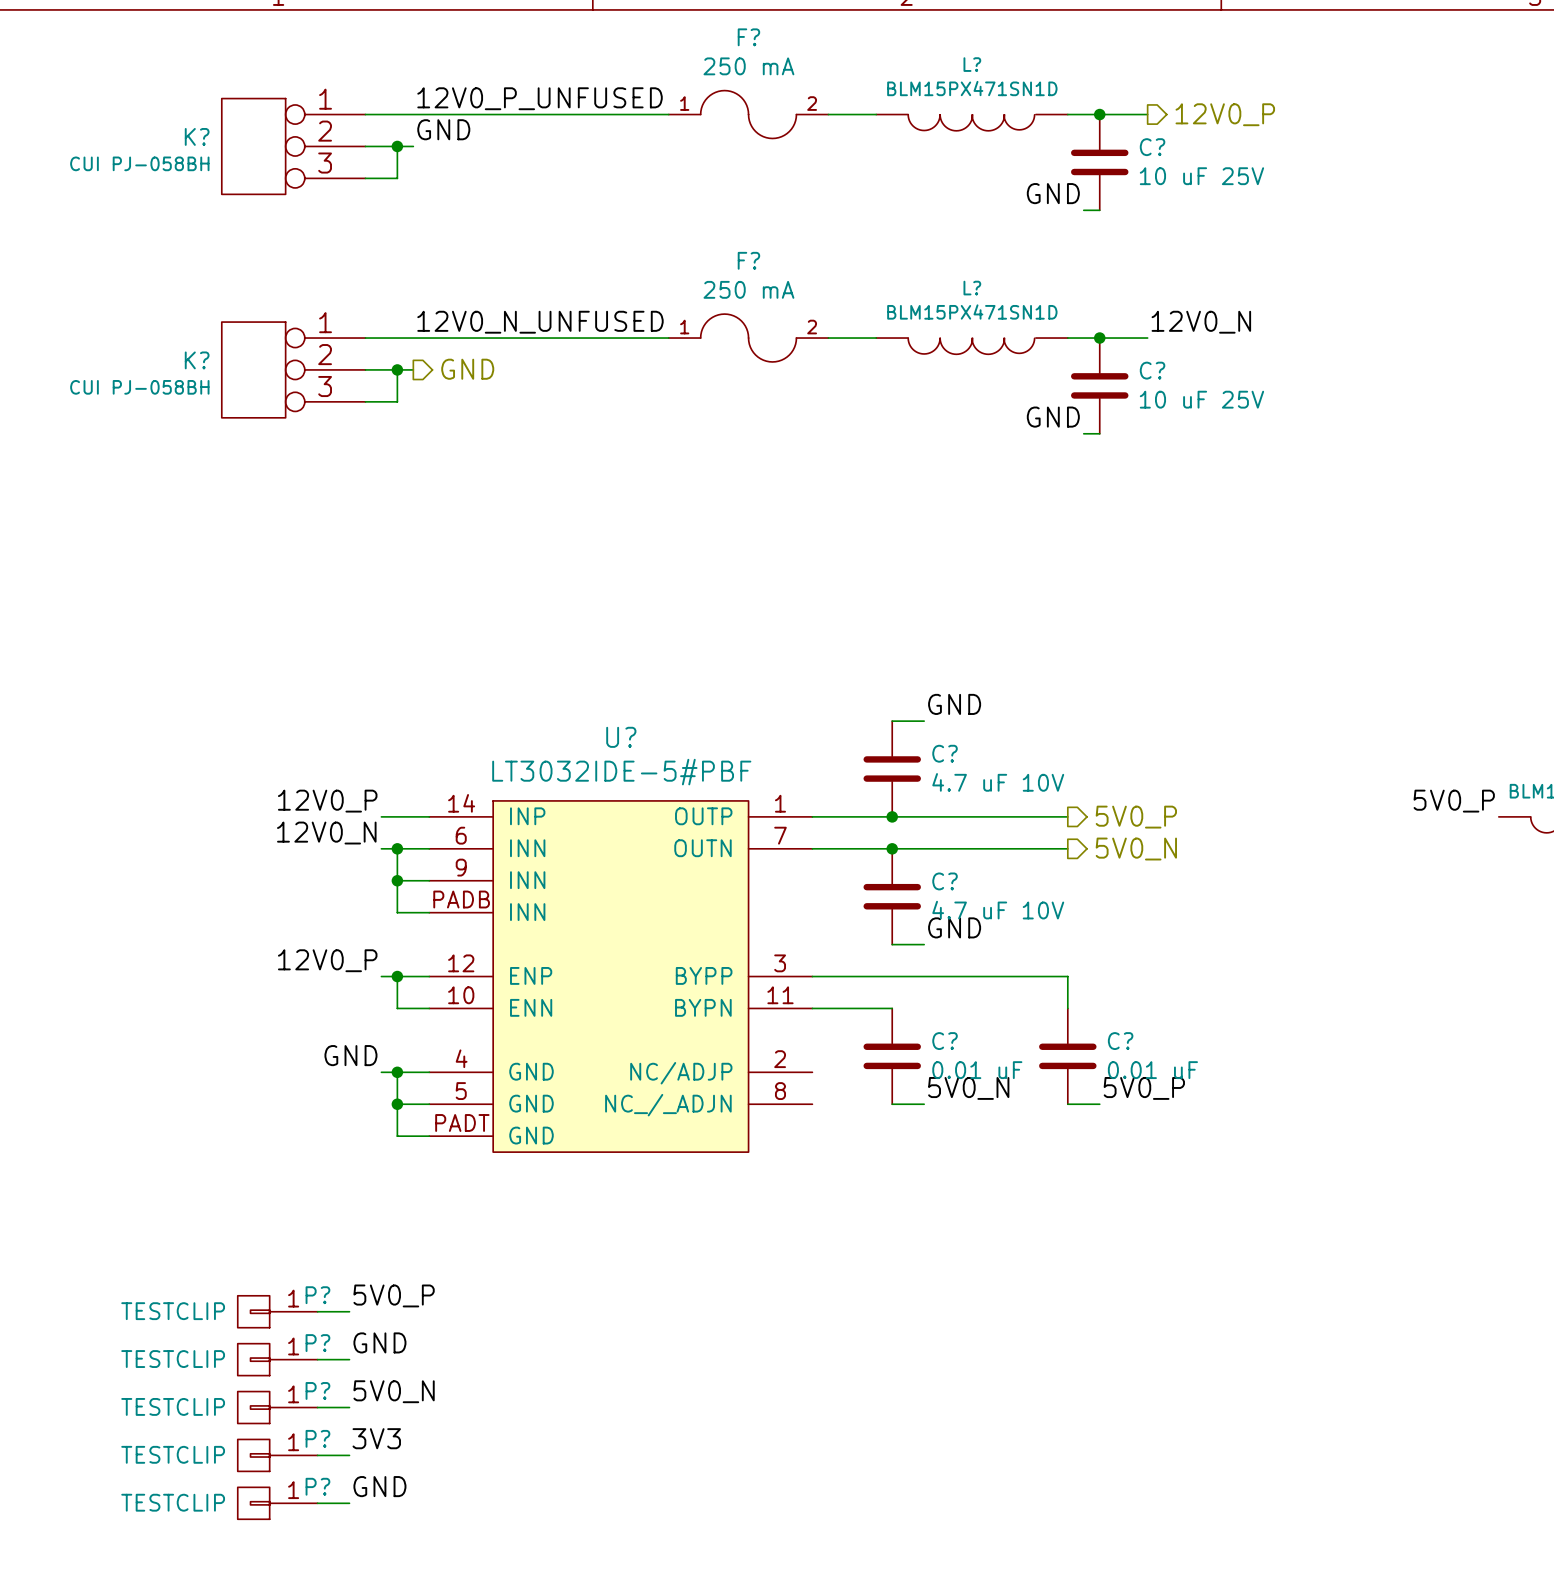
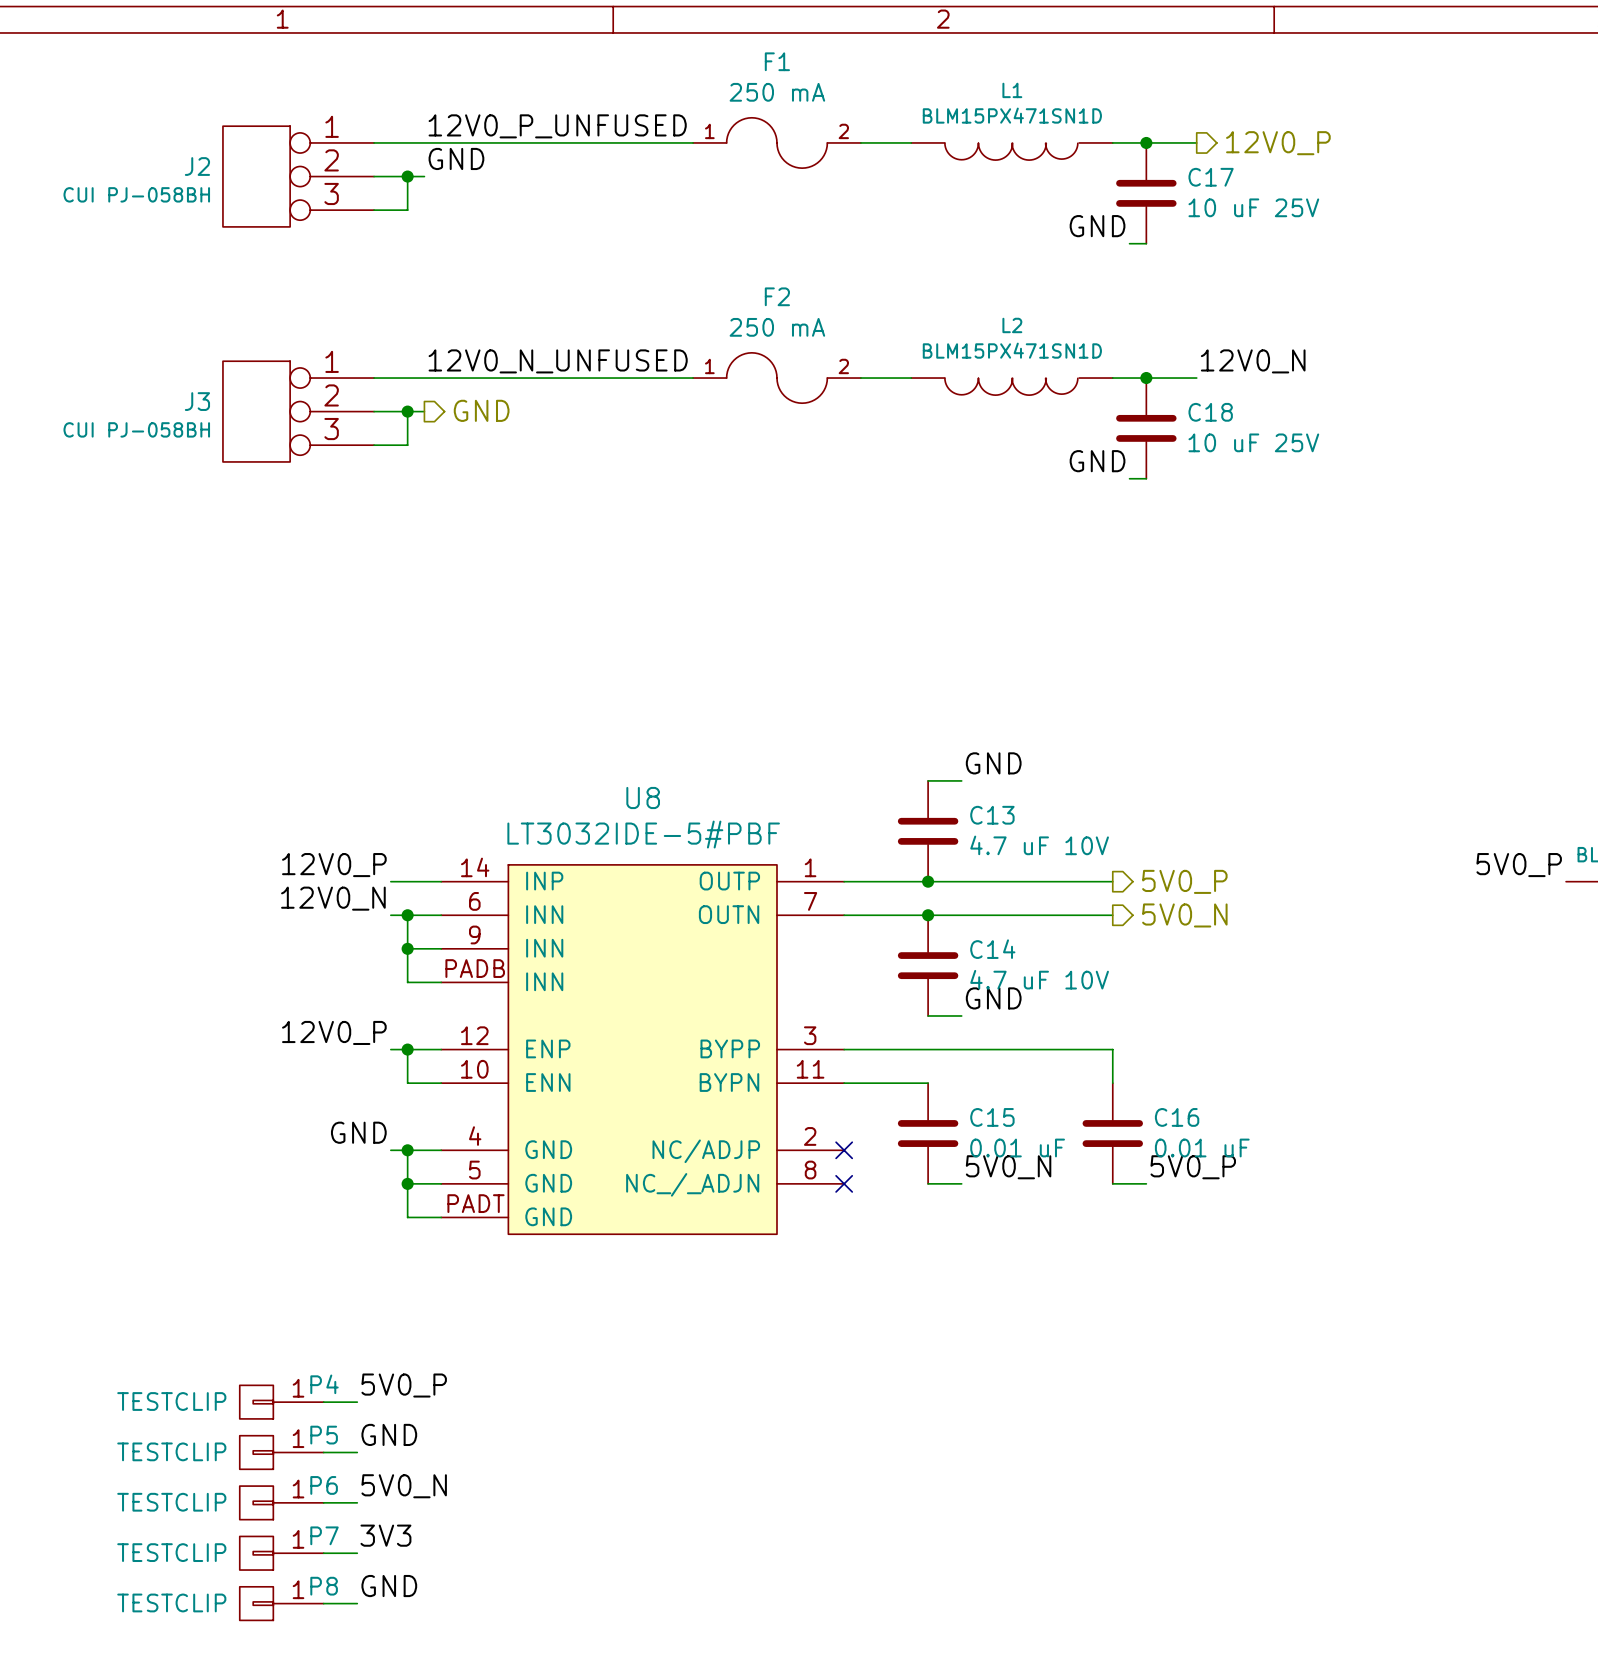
F? name: F? (748, 37) -> F1 (777, 61)
L? name: L? (972, 64) -> L1 (1012, 90)
K? name: K? (197, 136) -> J2 (197, 166)
C? name: C? (1152, 147) -> C17 (1211, 177)
F? name: F? (748, 260) -> F2 (777, 296)
L? name: L? (972, 288) -> L2 (1012, 325)
K? name: K? (197, 360) -> J3 (197, 401)
C? name: C? (1152, 370) -> C18 (1210, 412)
U? name: U? (621, 737) -> U8 (643, 797)
C? name: C? (945, 753) -> C13 (992, 815)
C? name: C? (945, 881) -> C14 (992, 949)
C? name: C? (945, 1041) -> C15 (992, 1117)
C? name: C? (1120, 1041) -> C16 (1177, 1117)
no-connect mark: none -> (844, 1150)
no-connect mark: none -> (844, 1183)
P? name: P? (317, 1295) -> P4 (324, 1384)
P? name: P? (317, 1343) -> P5 (324, 1435)
P? name: P? (317, 1390) -> P6 (324, 1485)
P? name: P? (317, 1438) -> P7 (324, 1535)
P? name: P? (317, 1486) -> P8 (324, 1586)

